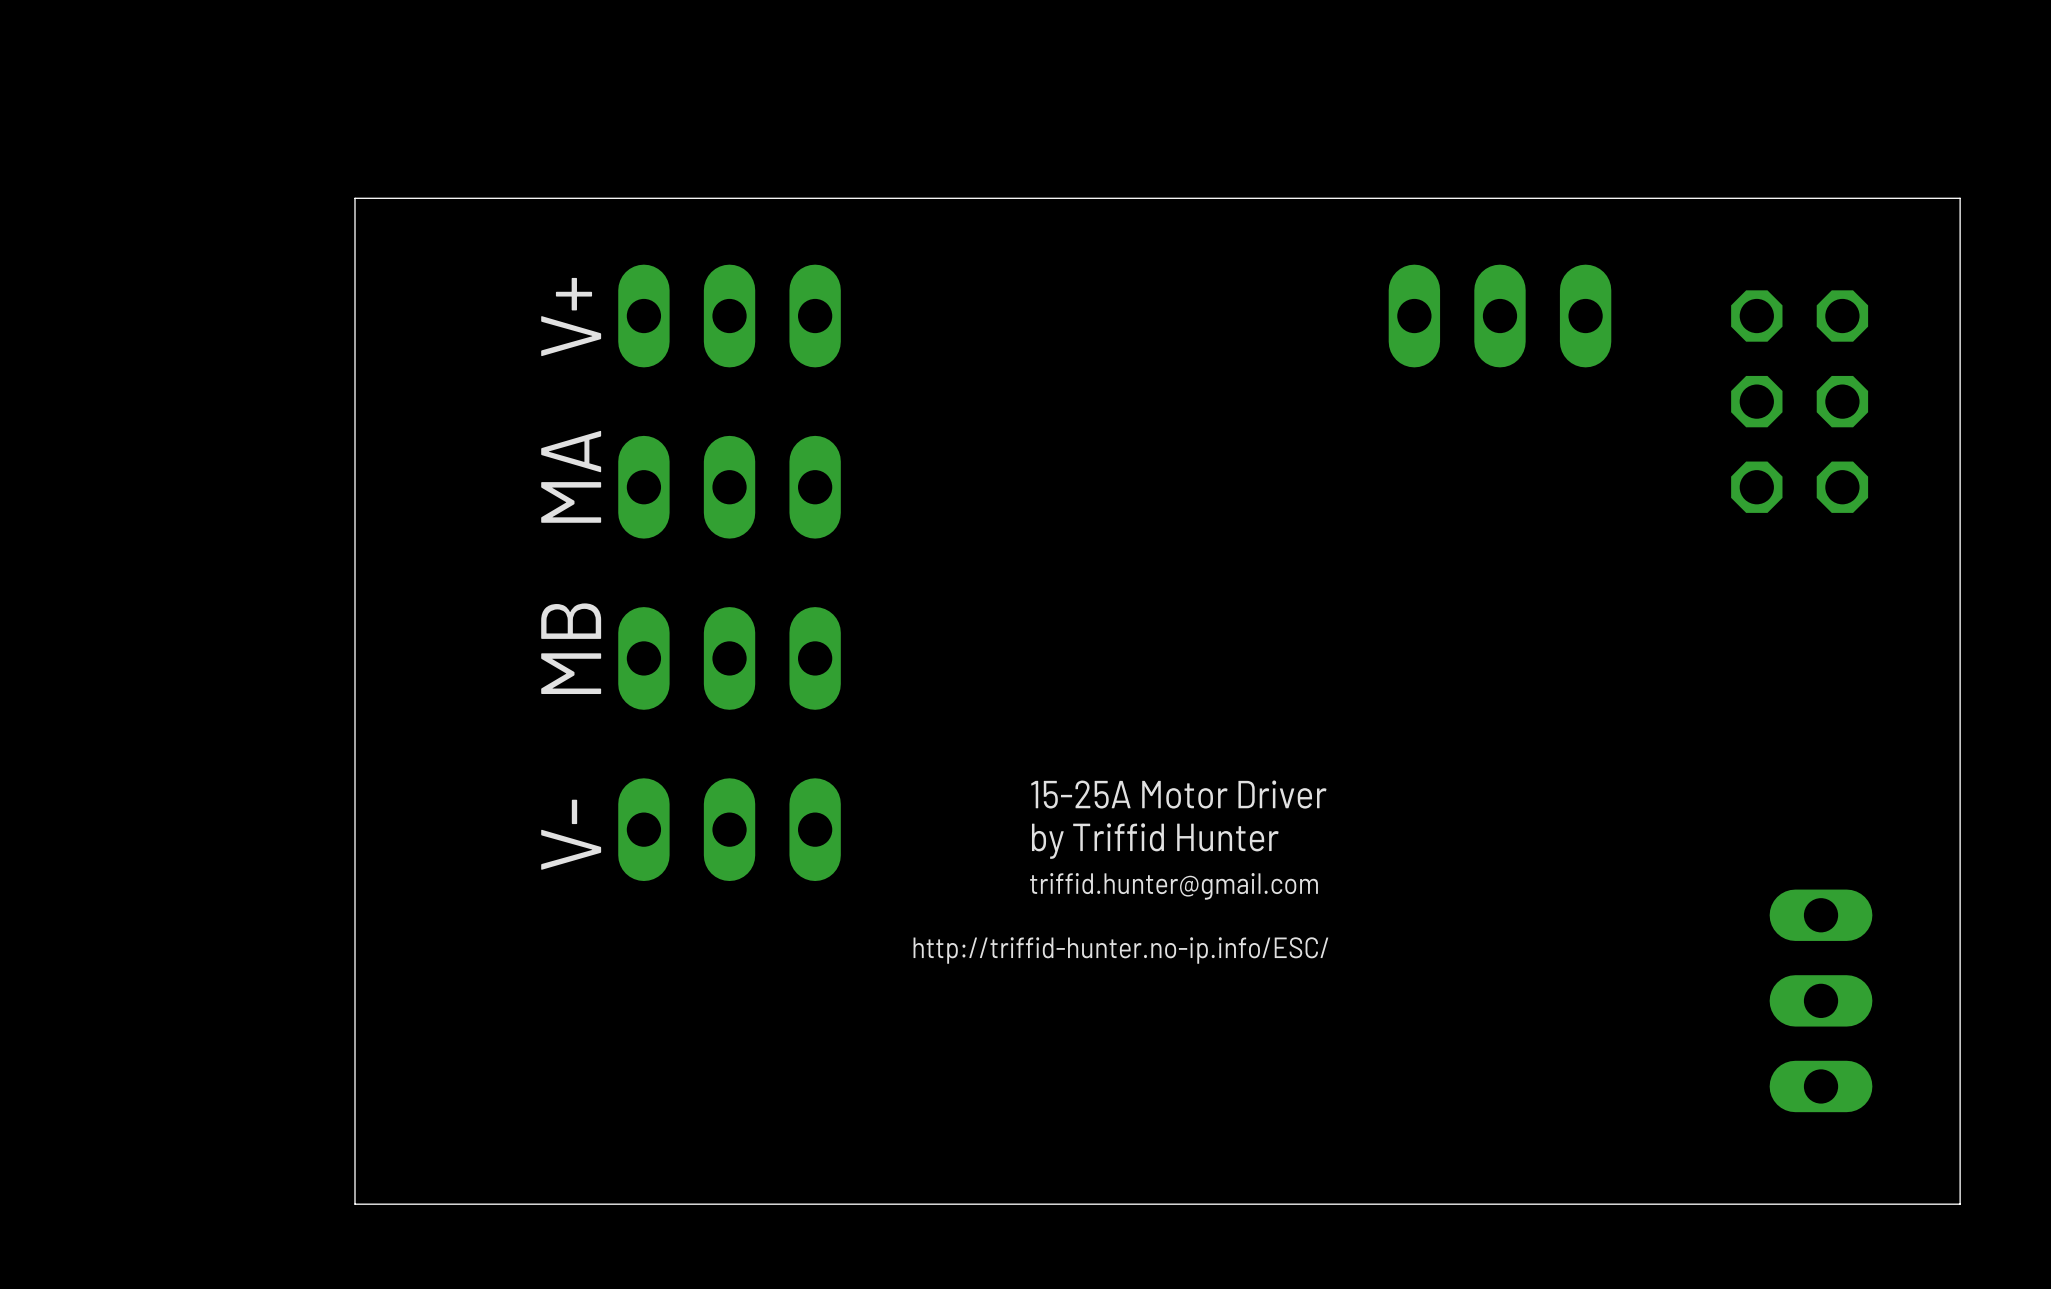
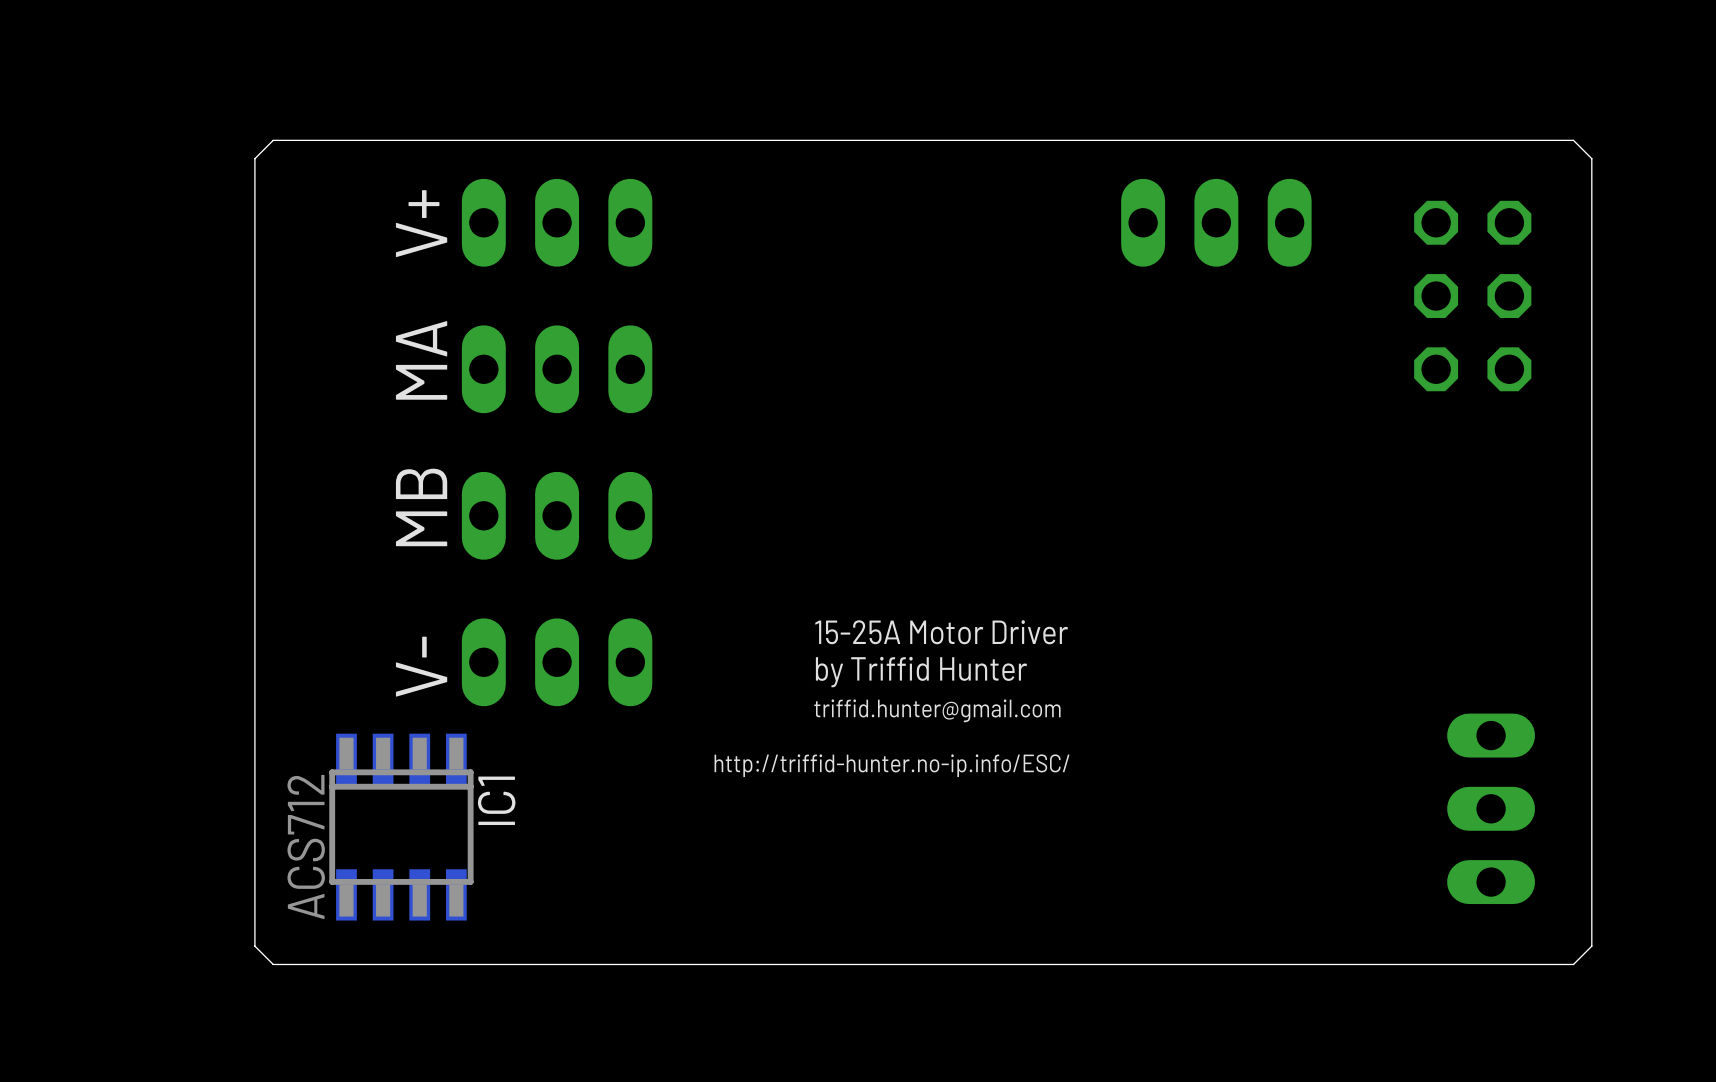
board edge: (1960, 198) (355, 198) (355, 1204) (1960, 1204) (1960, 198) -> (1573, 140) (1591, 158) (1591, 946) (1573, 964) (273, 964) (254, 946) (254, 158) (273, 140) (1573, 140)
IC1: none -> ACS712 (401, 827)

